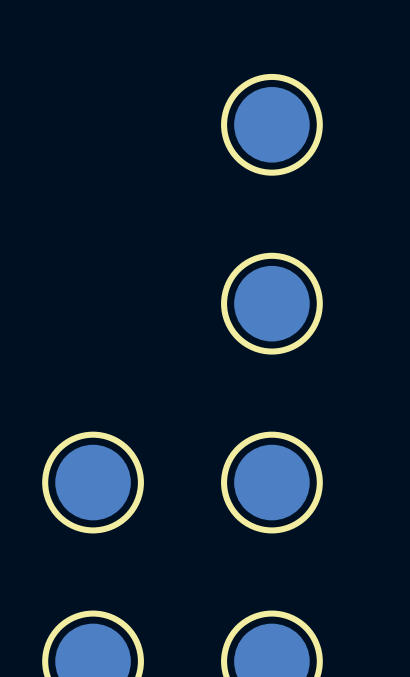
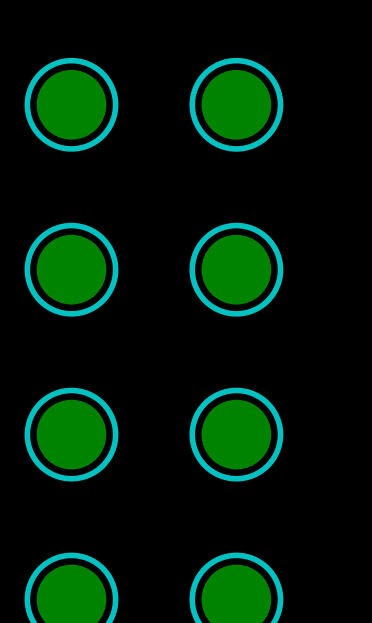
part: none -> (71, 104)
part: none -> (71, 269)

